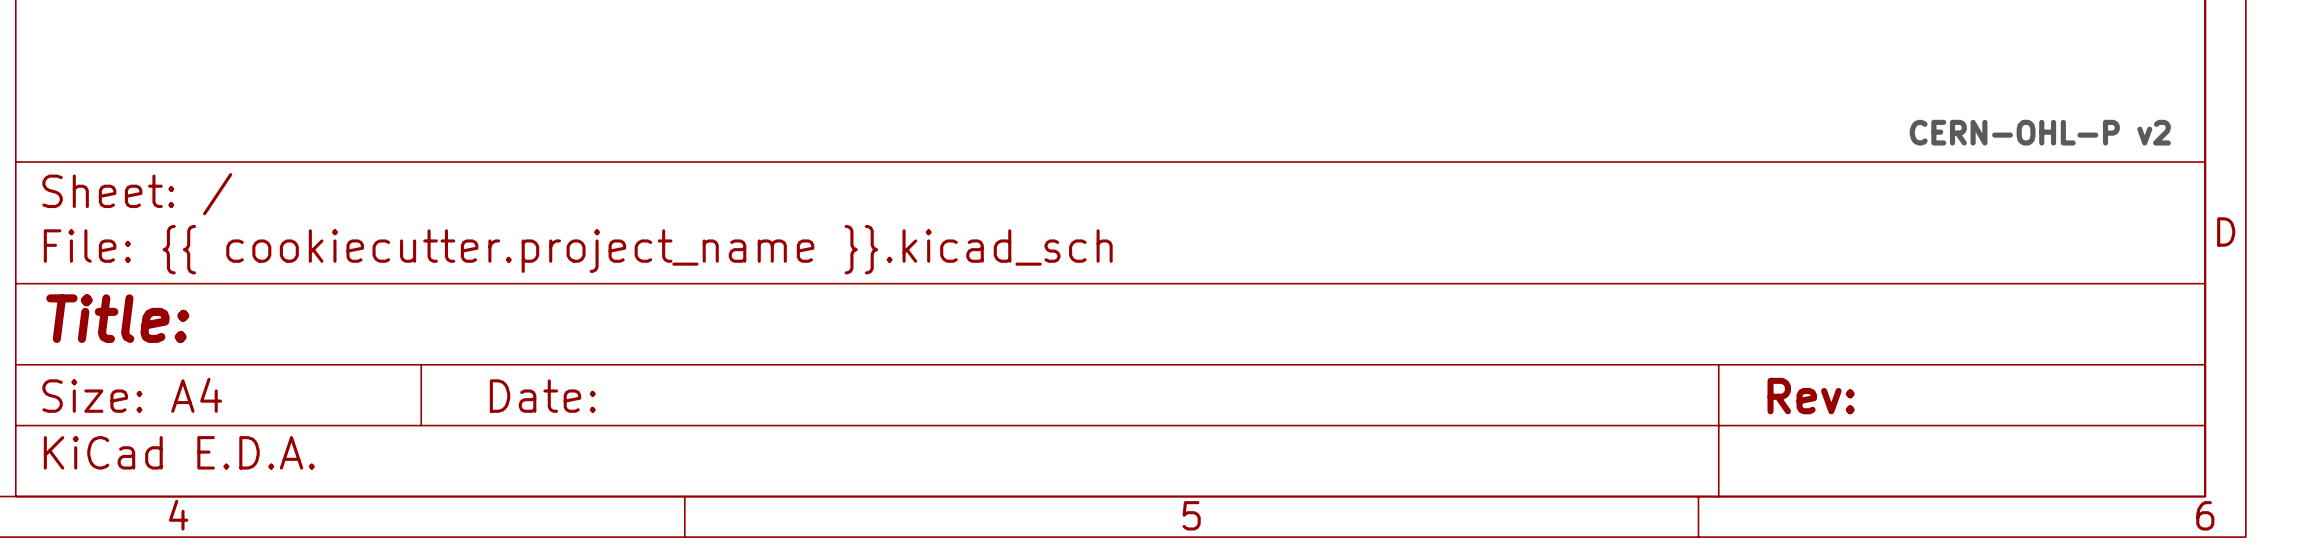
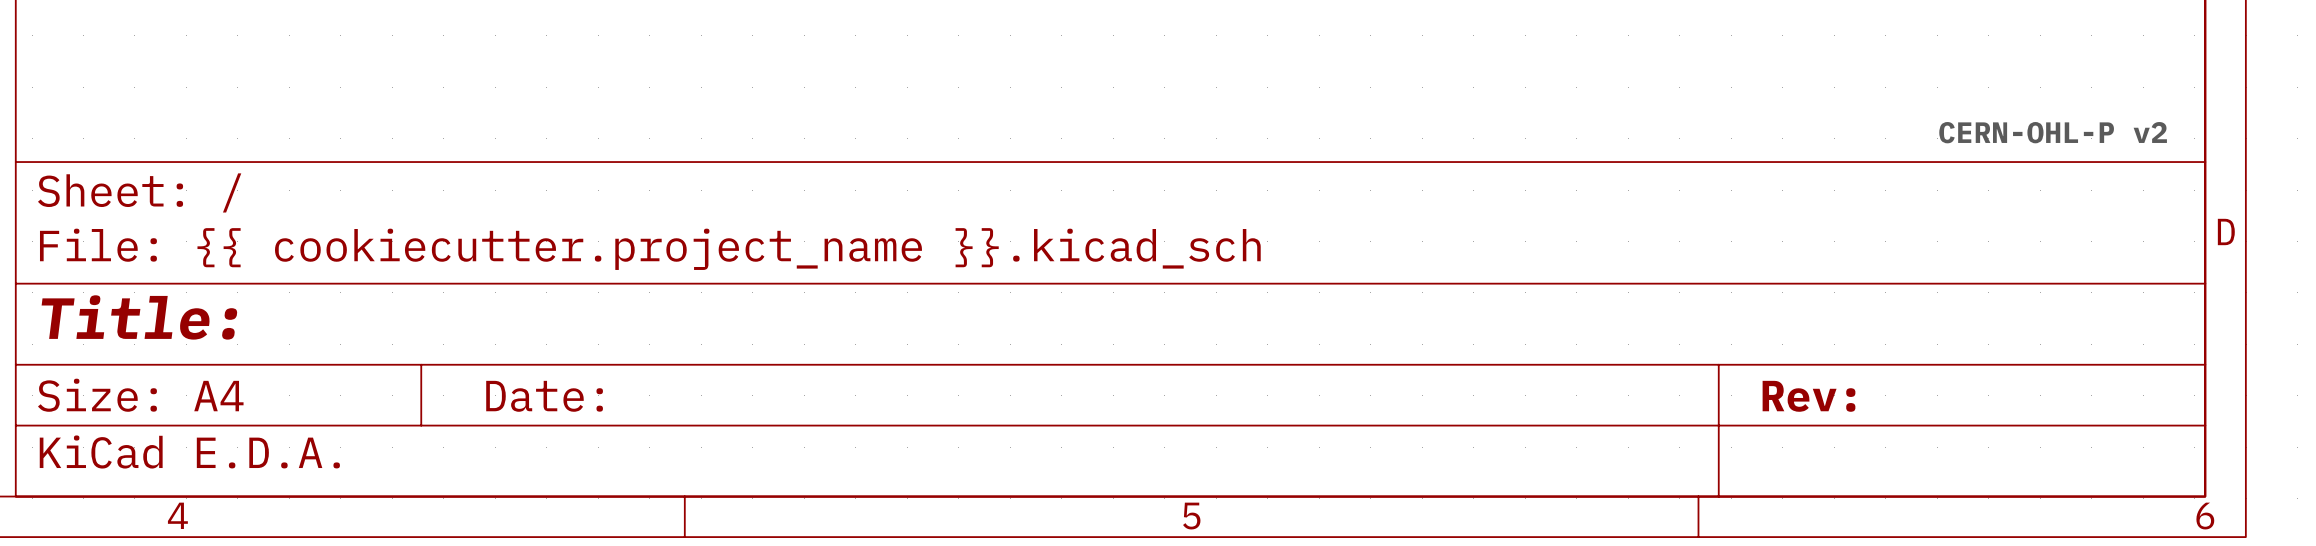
text position: CERN-OHL-P v2 (2040, 132) -> CERN-OHL-P v2 (2053, 132)

